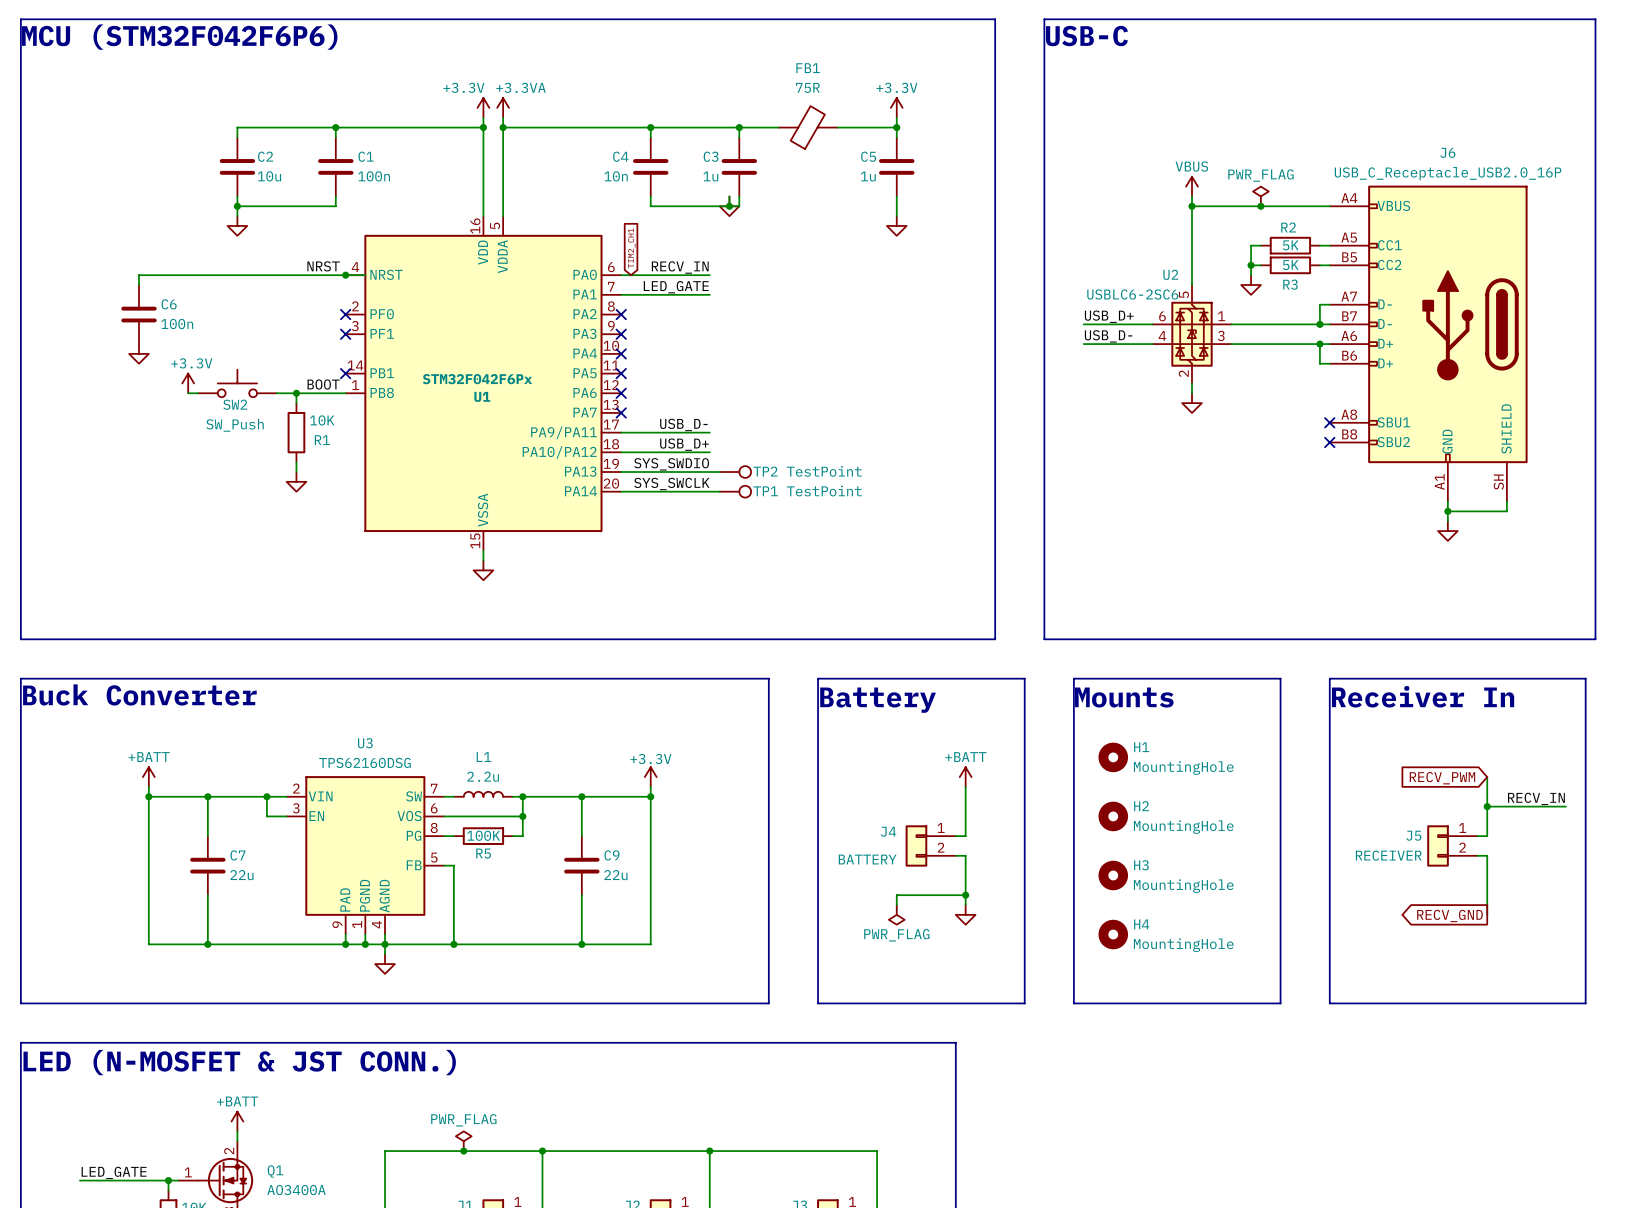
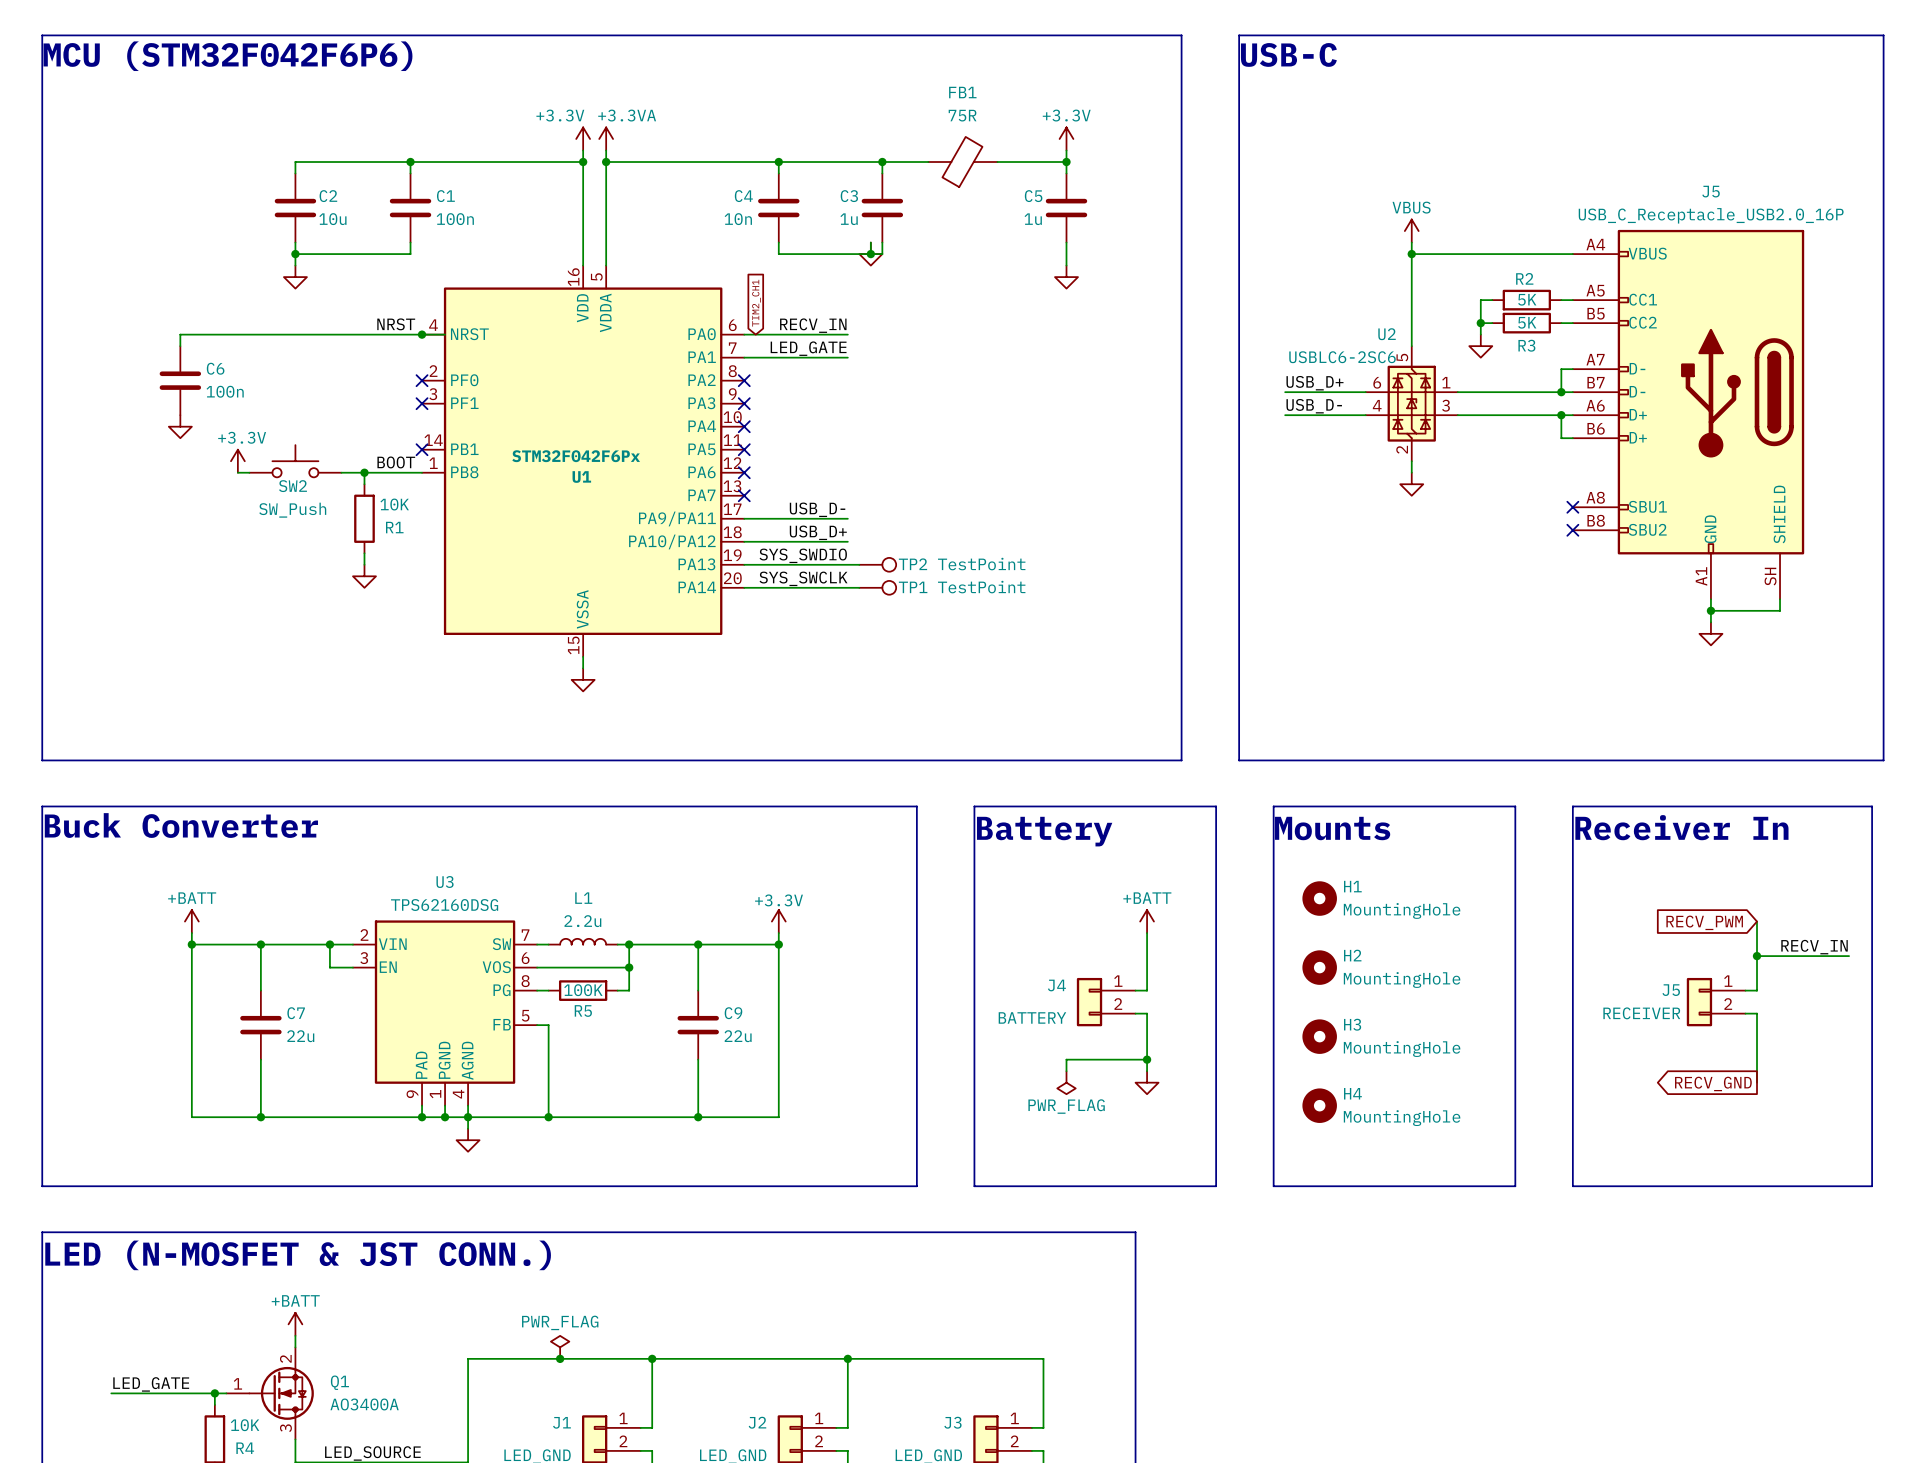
J6 name: J6 (1447, 152) -> J5 (1711, 191)
power symbol: PWR_FLAG (1260, 196) -> none
junction: (1260, 206) -> none

